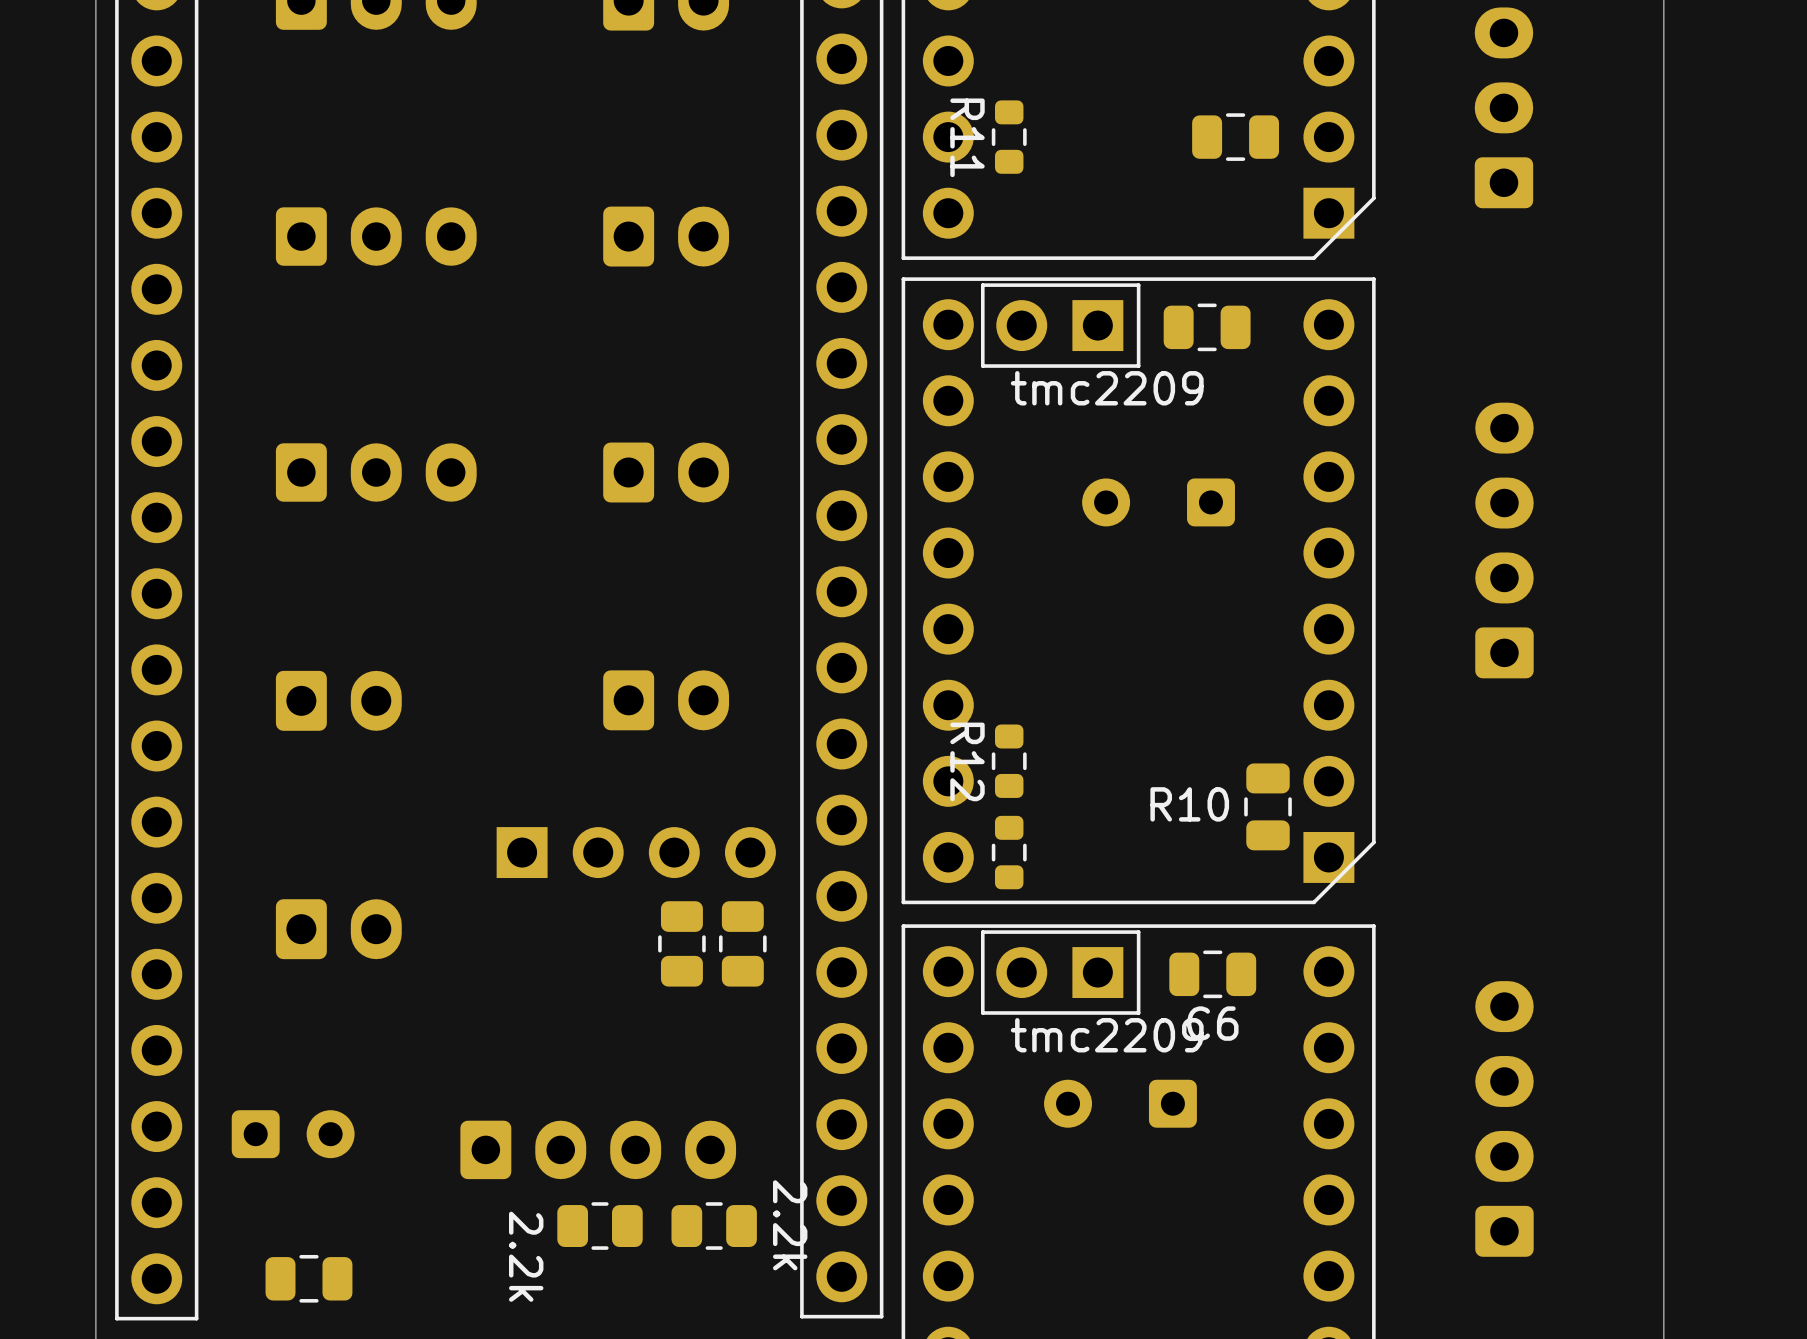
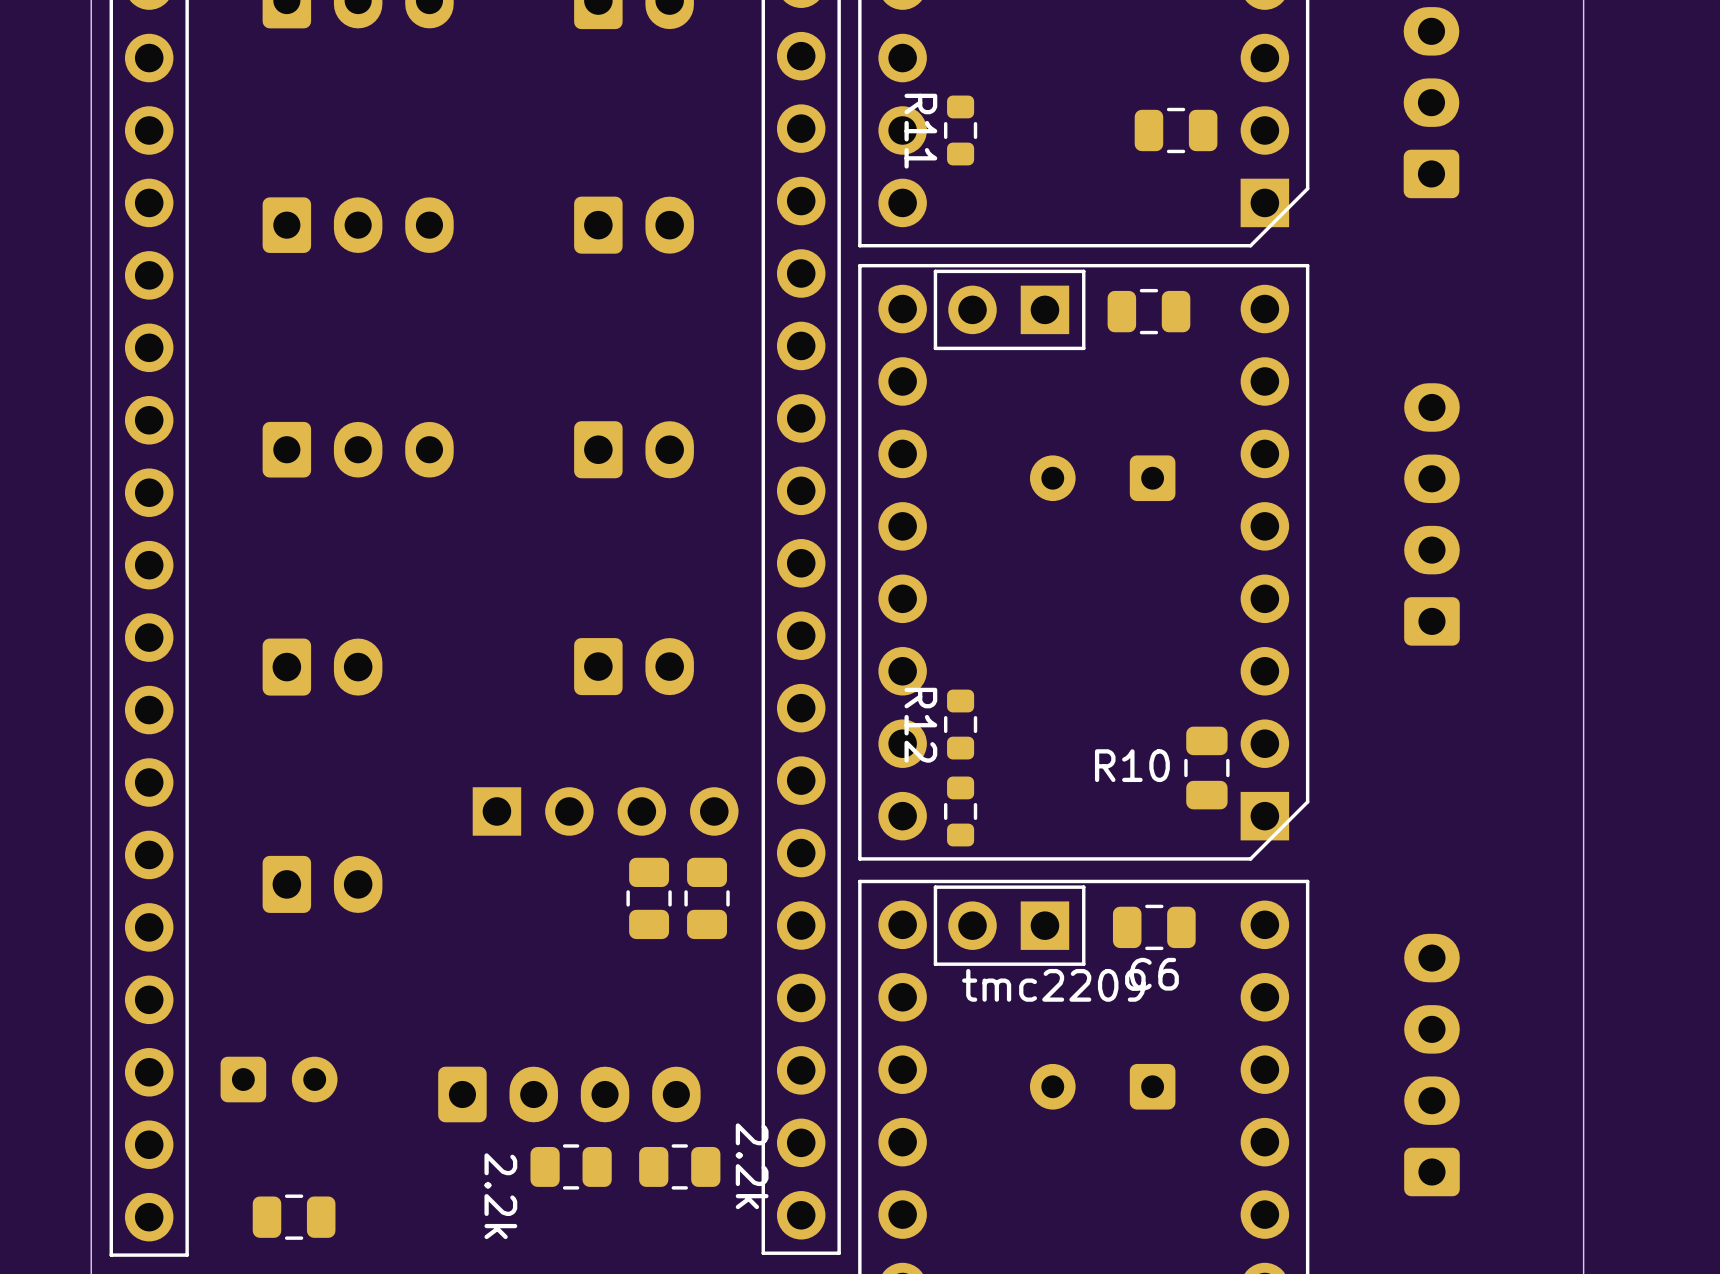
part value: tmc2209 (1107, 388) -> none
part position: (1120, 1103) -> (1102, 1086)

